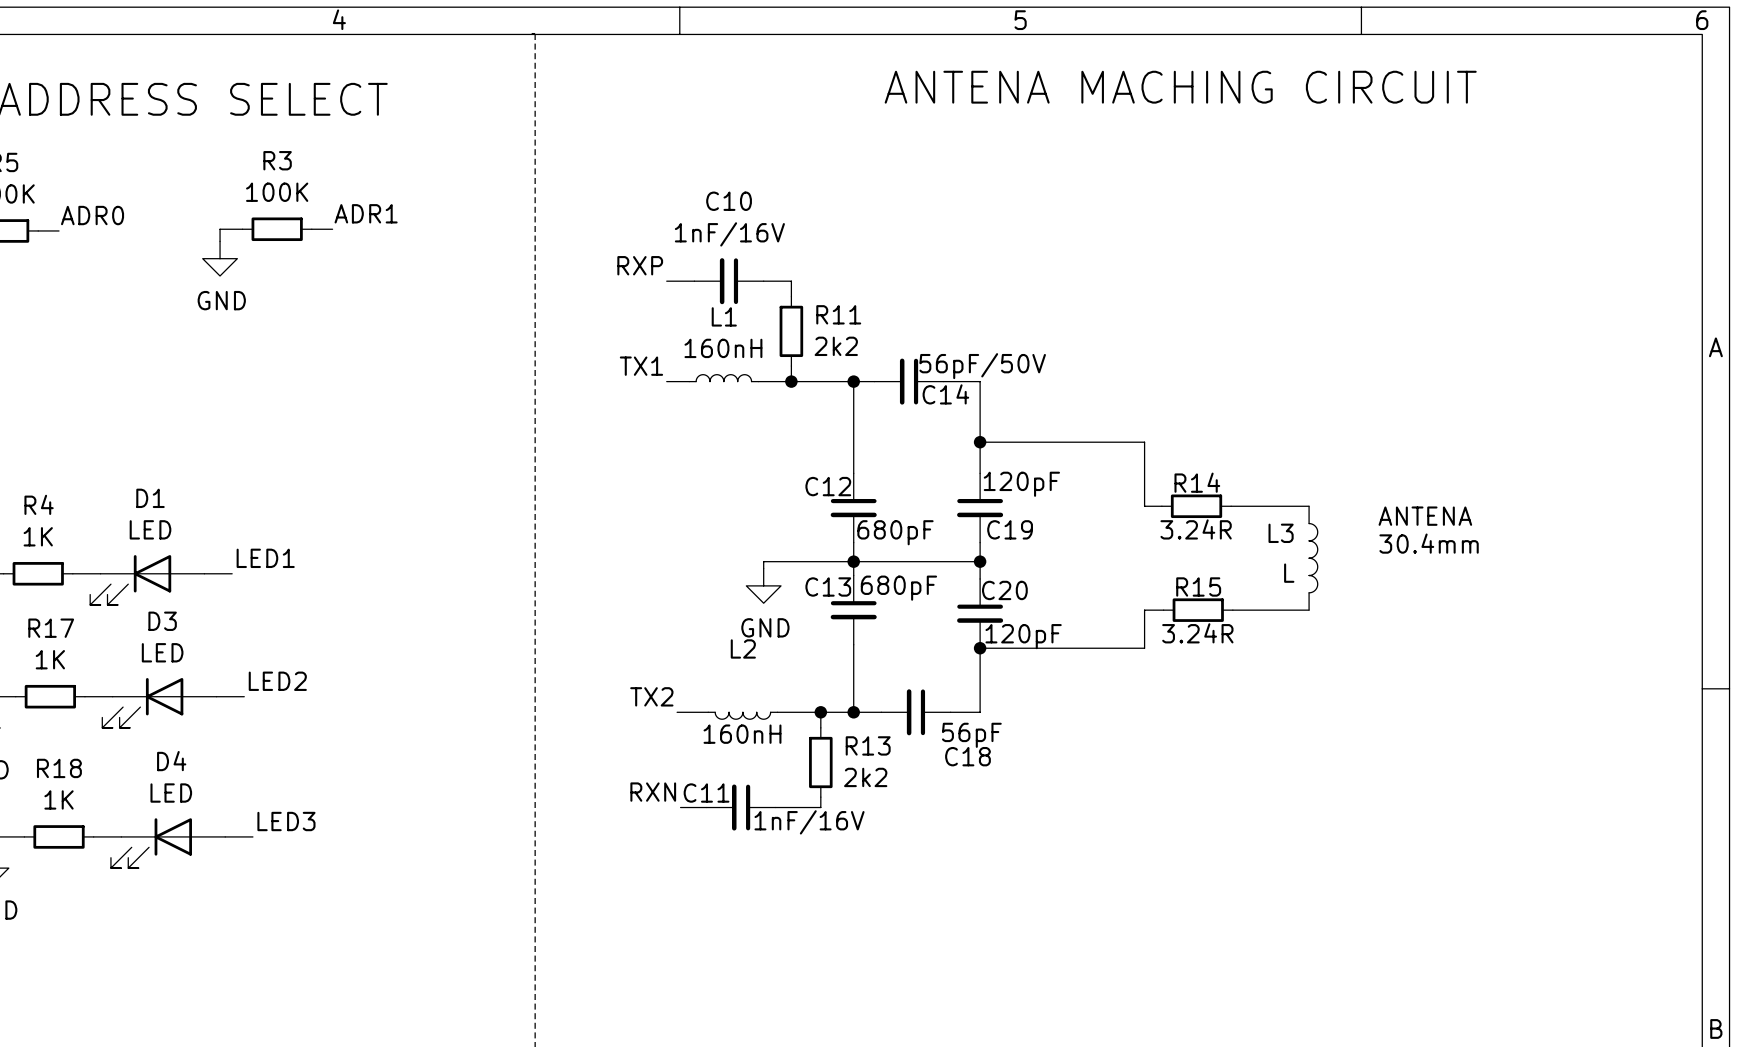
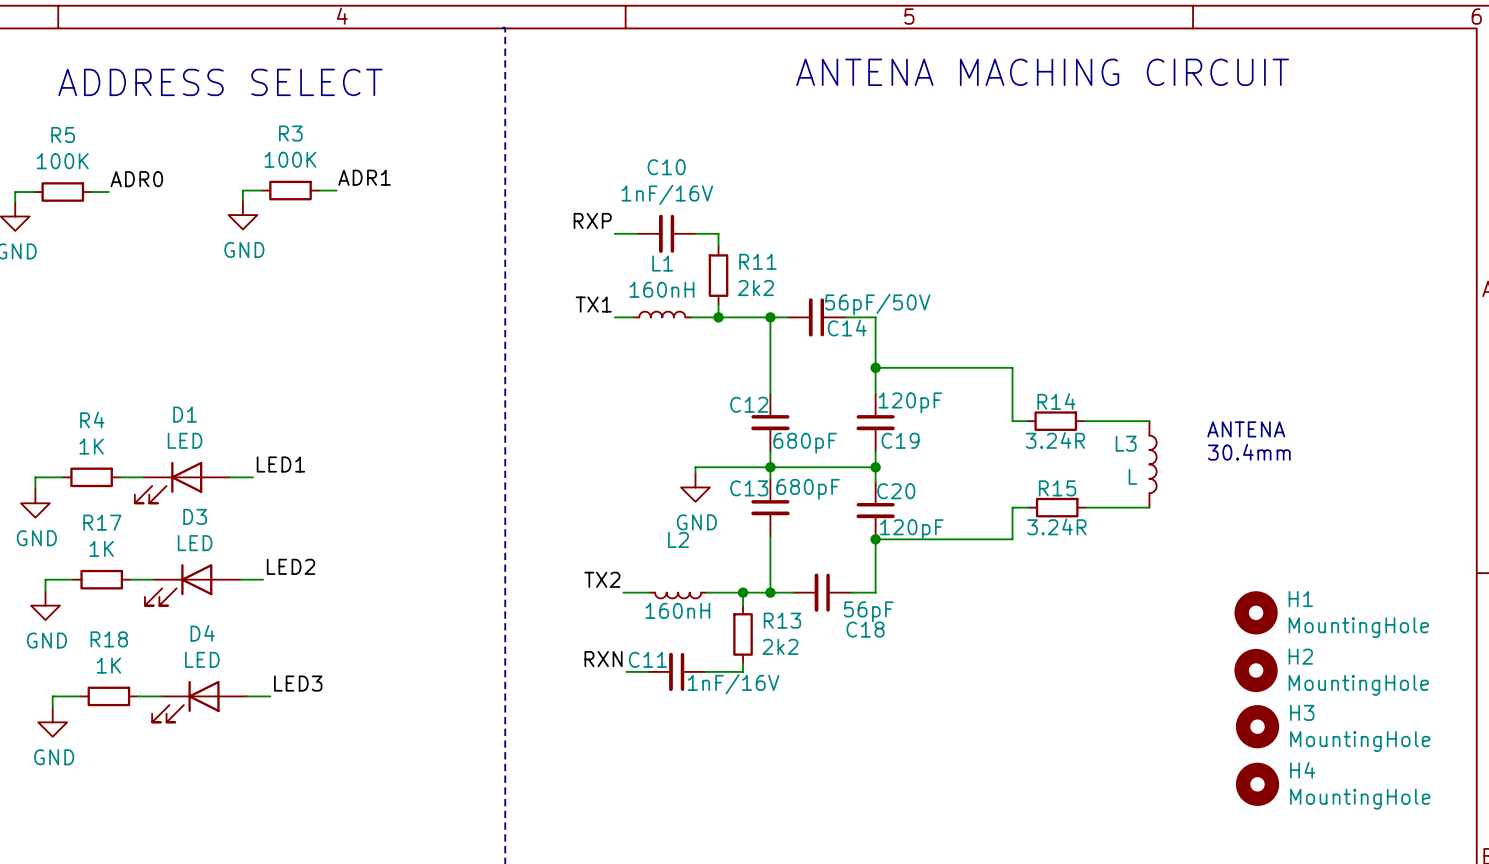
H1: none -> MountingHole (1256, 612)
H2: none -> MountingHole (1256, 670)
H3: none -> MountingHole (1257, 726)
H4: none -> MountingHole (1257, 784)

